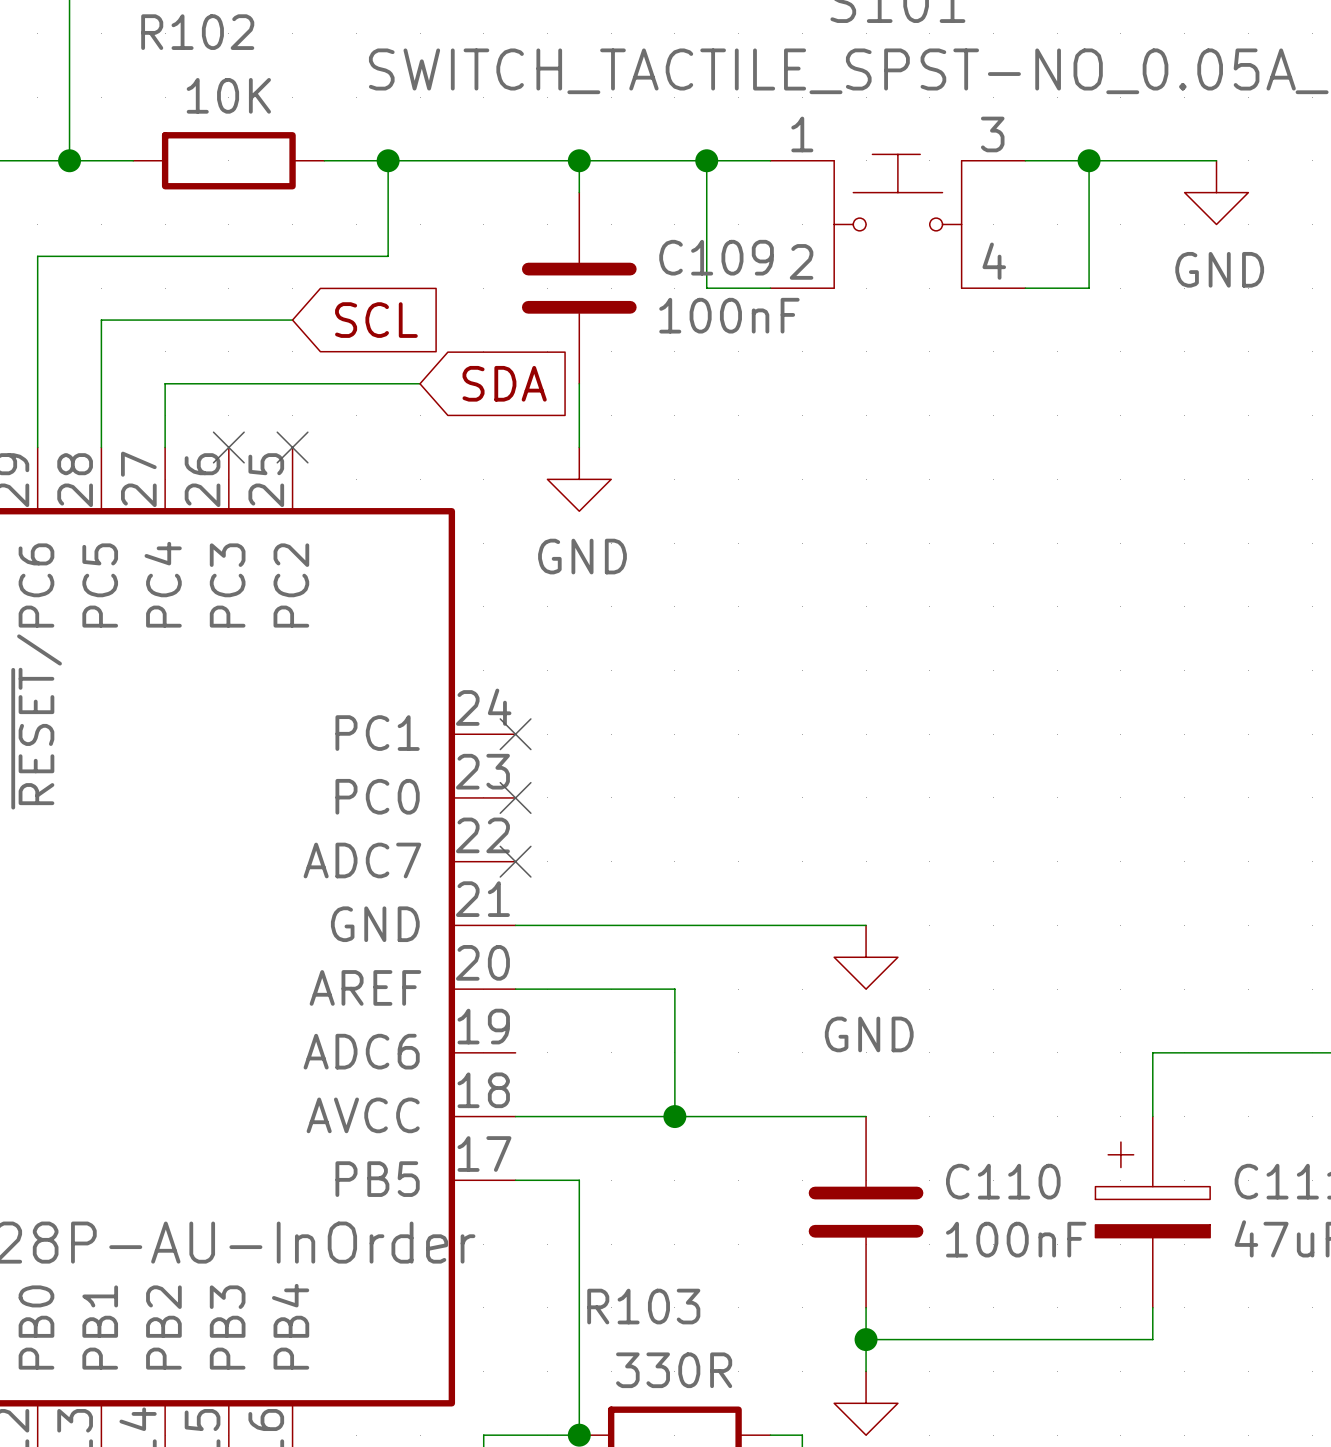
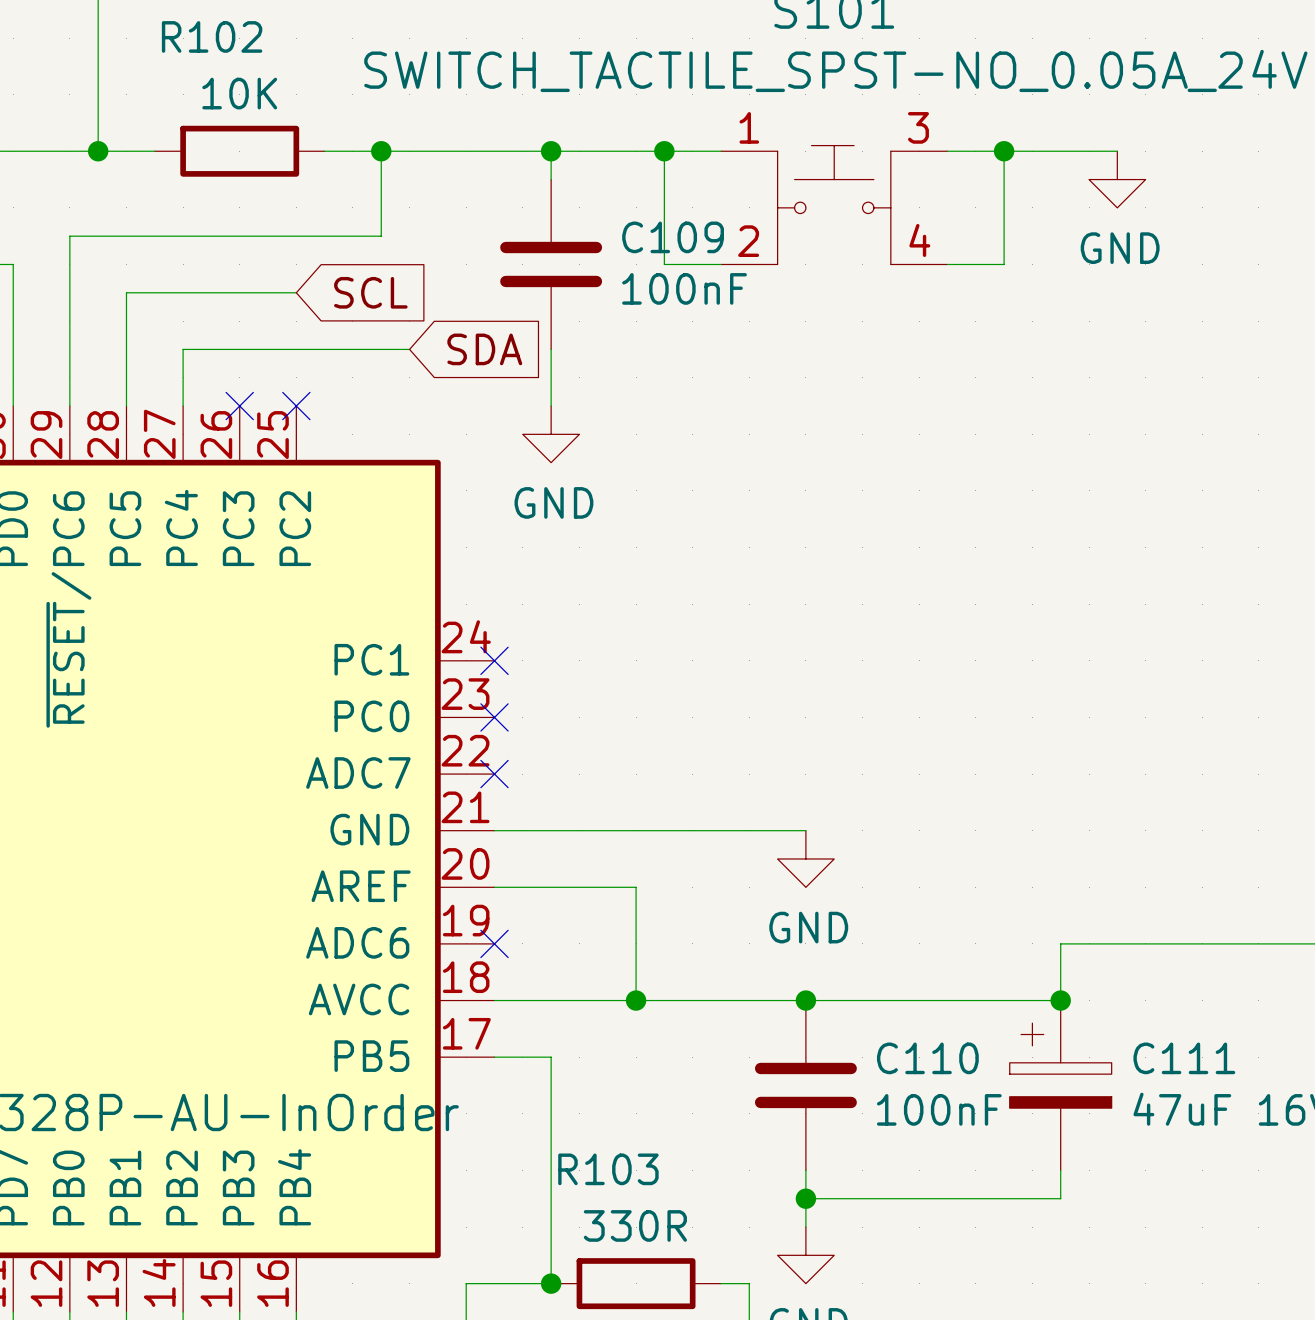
no-connect mark: none -> (494, 943)
wire: none -> (805, 1000) (1060, 1000)
junction: none -> (805, 1000)
junction: none -> (1060, 1000)

